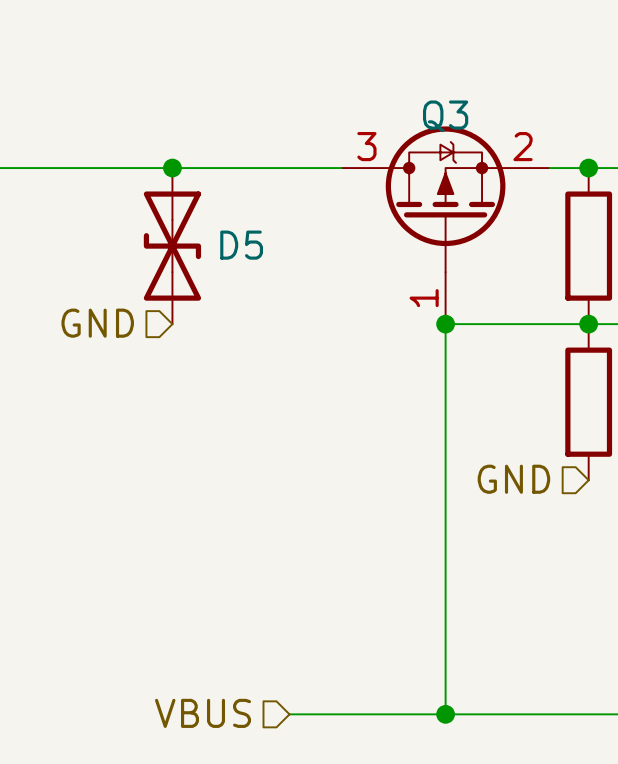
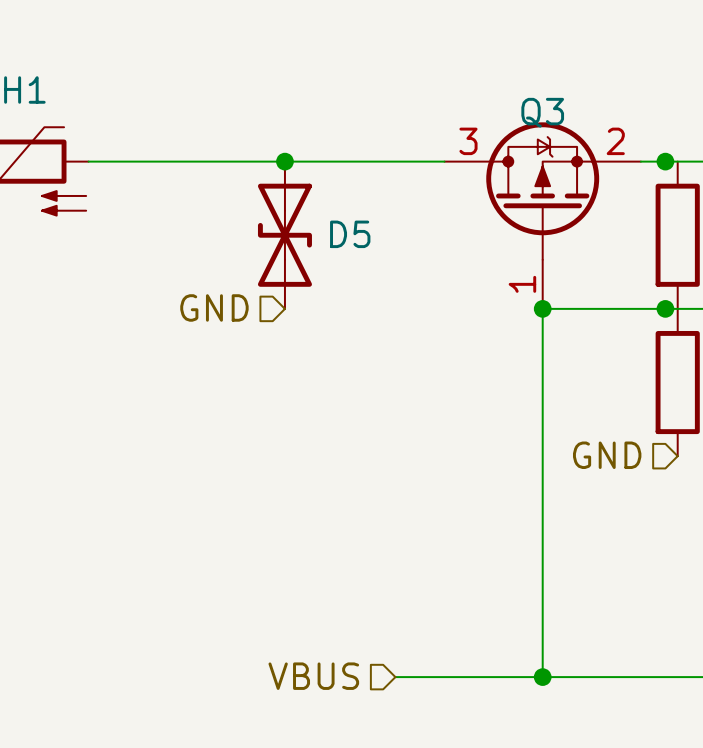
junction position: (588, 168) -> (665, 161)
junction position: (588, 324) -> (665, 308)

